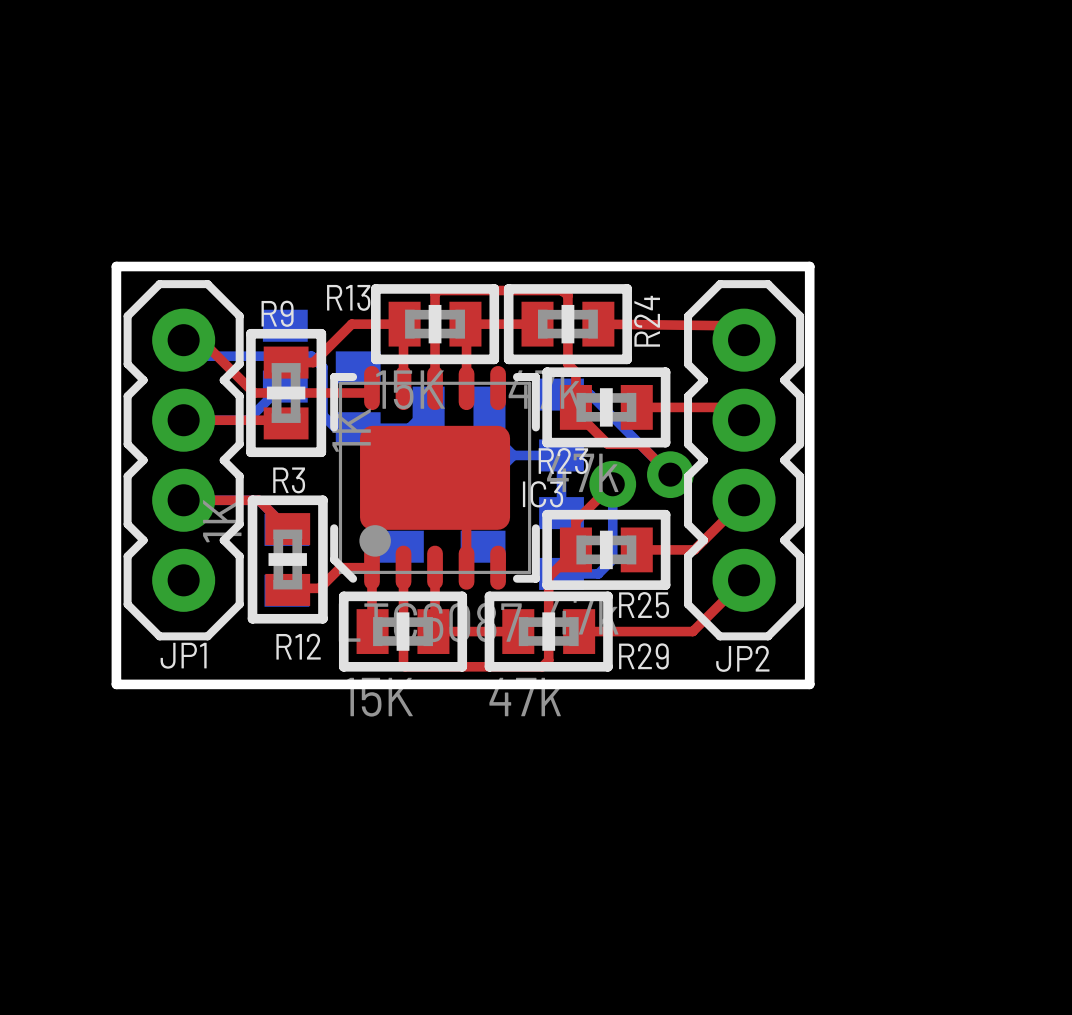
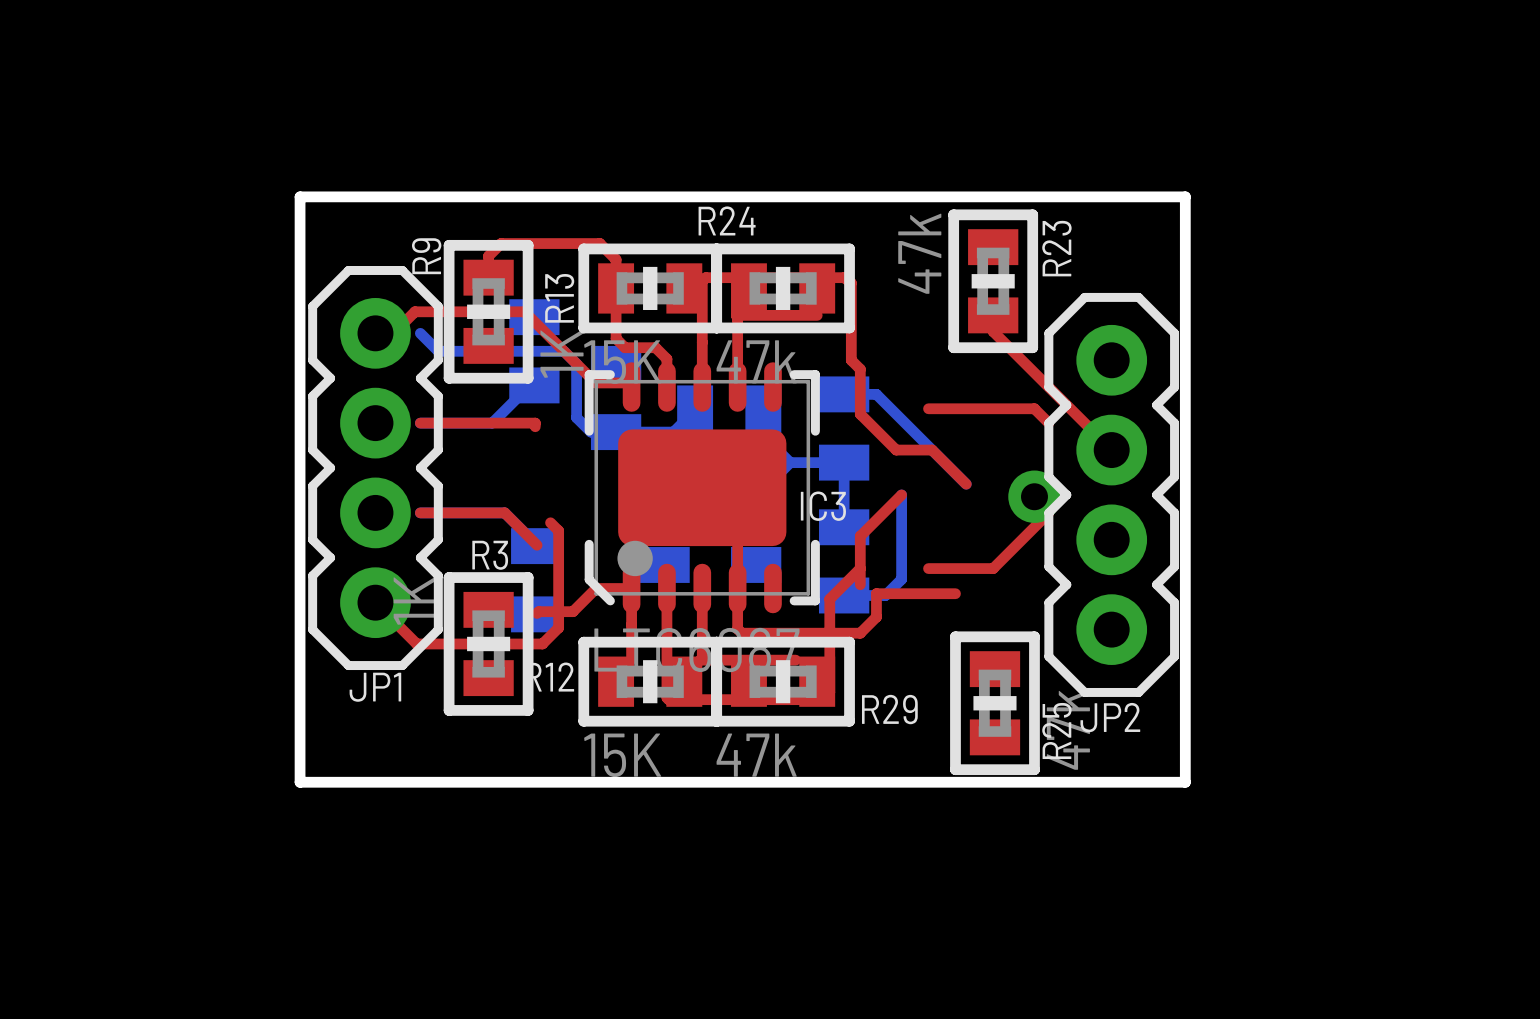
board edge: (116, 266) (809, 266) (809, 684) (116, 684) (116, 266) -> (300, 196) (300, 782) (1185, 782) (1185, 196) (300, 196)
R13 name rotation: 0° (348, 297) -> 90° counterclockwise (559, 298)
R9 name rotation: 0° (277, 313) -> 90° counterclockwise (426, 256)
R24 name rotation: 0° (647, 321) -> 90° clockwise (727, 220)
R24 name position: R24 (647, 321) -> R24 (727, 220)
R13 position: (435, 324) -> (650, 288)
R24 position: (567, 324) -> (783, 288)
top track: (598, 324) (729, 325) (744, 340) -> none
top track: none -> (993, 315) (993, 331) (1111, 450)
top track: none -> (375, 333) (393, 333) (414, 311) (524, 311) (595, 382) (631, 382)
top track: (183, 340) (201, 340) (254, 393) (367, 393) (372, 388) -> none
top track: (286, 362) (313, 362) (351, 324) (404, 324) (403, 363) -> (488, 277) (488, 256) (501, 243) (599, 243) (616, 259) (616, 338) (625, 347) (655, 347) (666, 359)
R9 position: (286, 393) -> (488, 311)
R23 rotation: 0° (606, 407) -> 90° clockwise (993, 281)
R23 position: (606, 407) -> (993, 281)
JP1 position: (183, 460) -> (375, 468)
JP2 position: (744, 460) -> (1111, 494)
via: (670, 474) -> none
via: (612, 484) -> none
via: none -> (1034, 496)
top track: none -> (550, 522) (558, 530) (558, 627) (542, 643) (416, 643) (375, 602)
R25 rotation: 0° (606, 549) -> 90° clockwise (994, 703)
R25 position: (606, 549) -> (994, 703)
R3 position: (287, 559) -> (488, 643)
top track: none -> (737, 588) (737, 629) (741, 633) (860, 633) (876, 617) (876, 593) (955, 593)
top track: (744, 580) (692, 631) (579, 631) -> none
R12 position: (403, 631) -> (650, 681)
R29 position: (548, 631) -> (783, 681)

